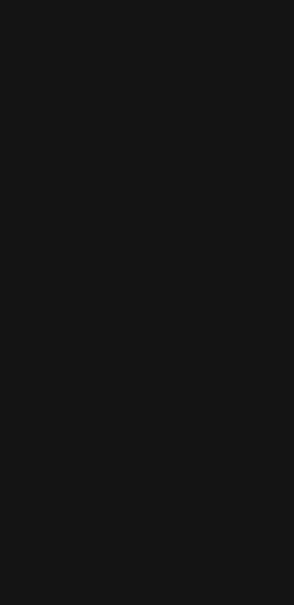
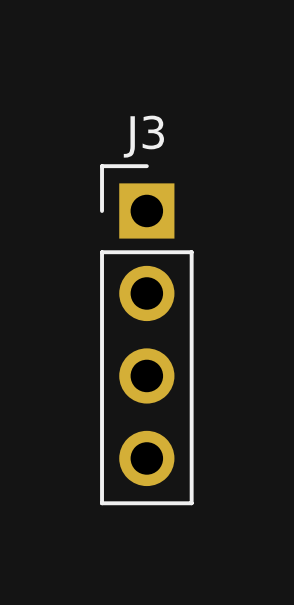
J3: none -> (146, 334)

